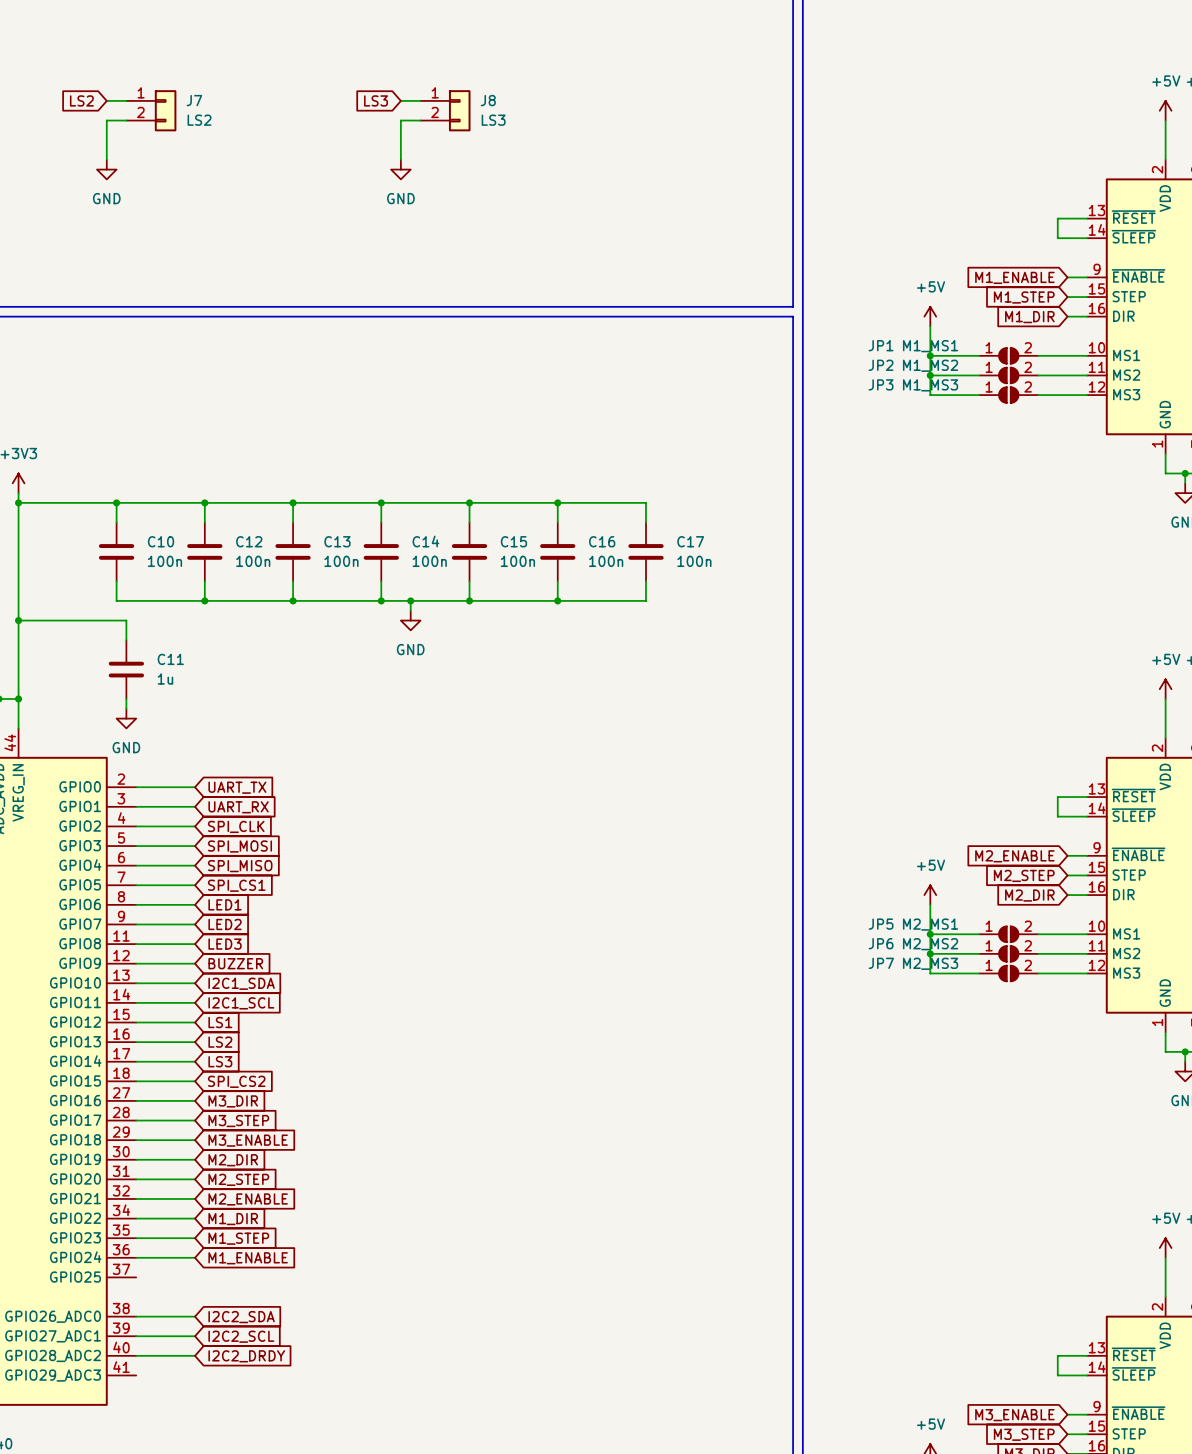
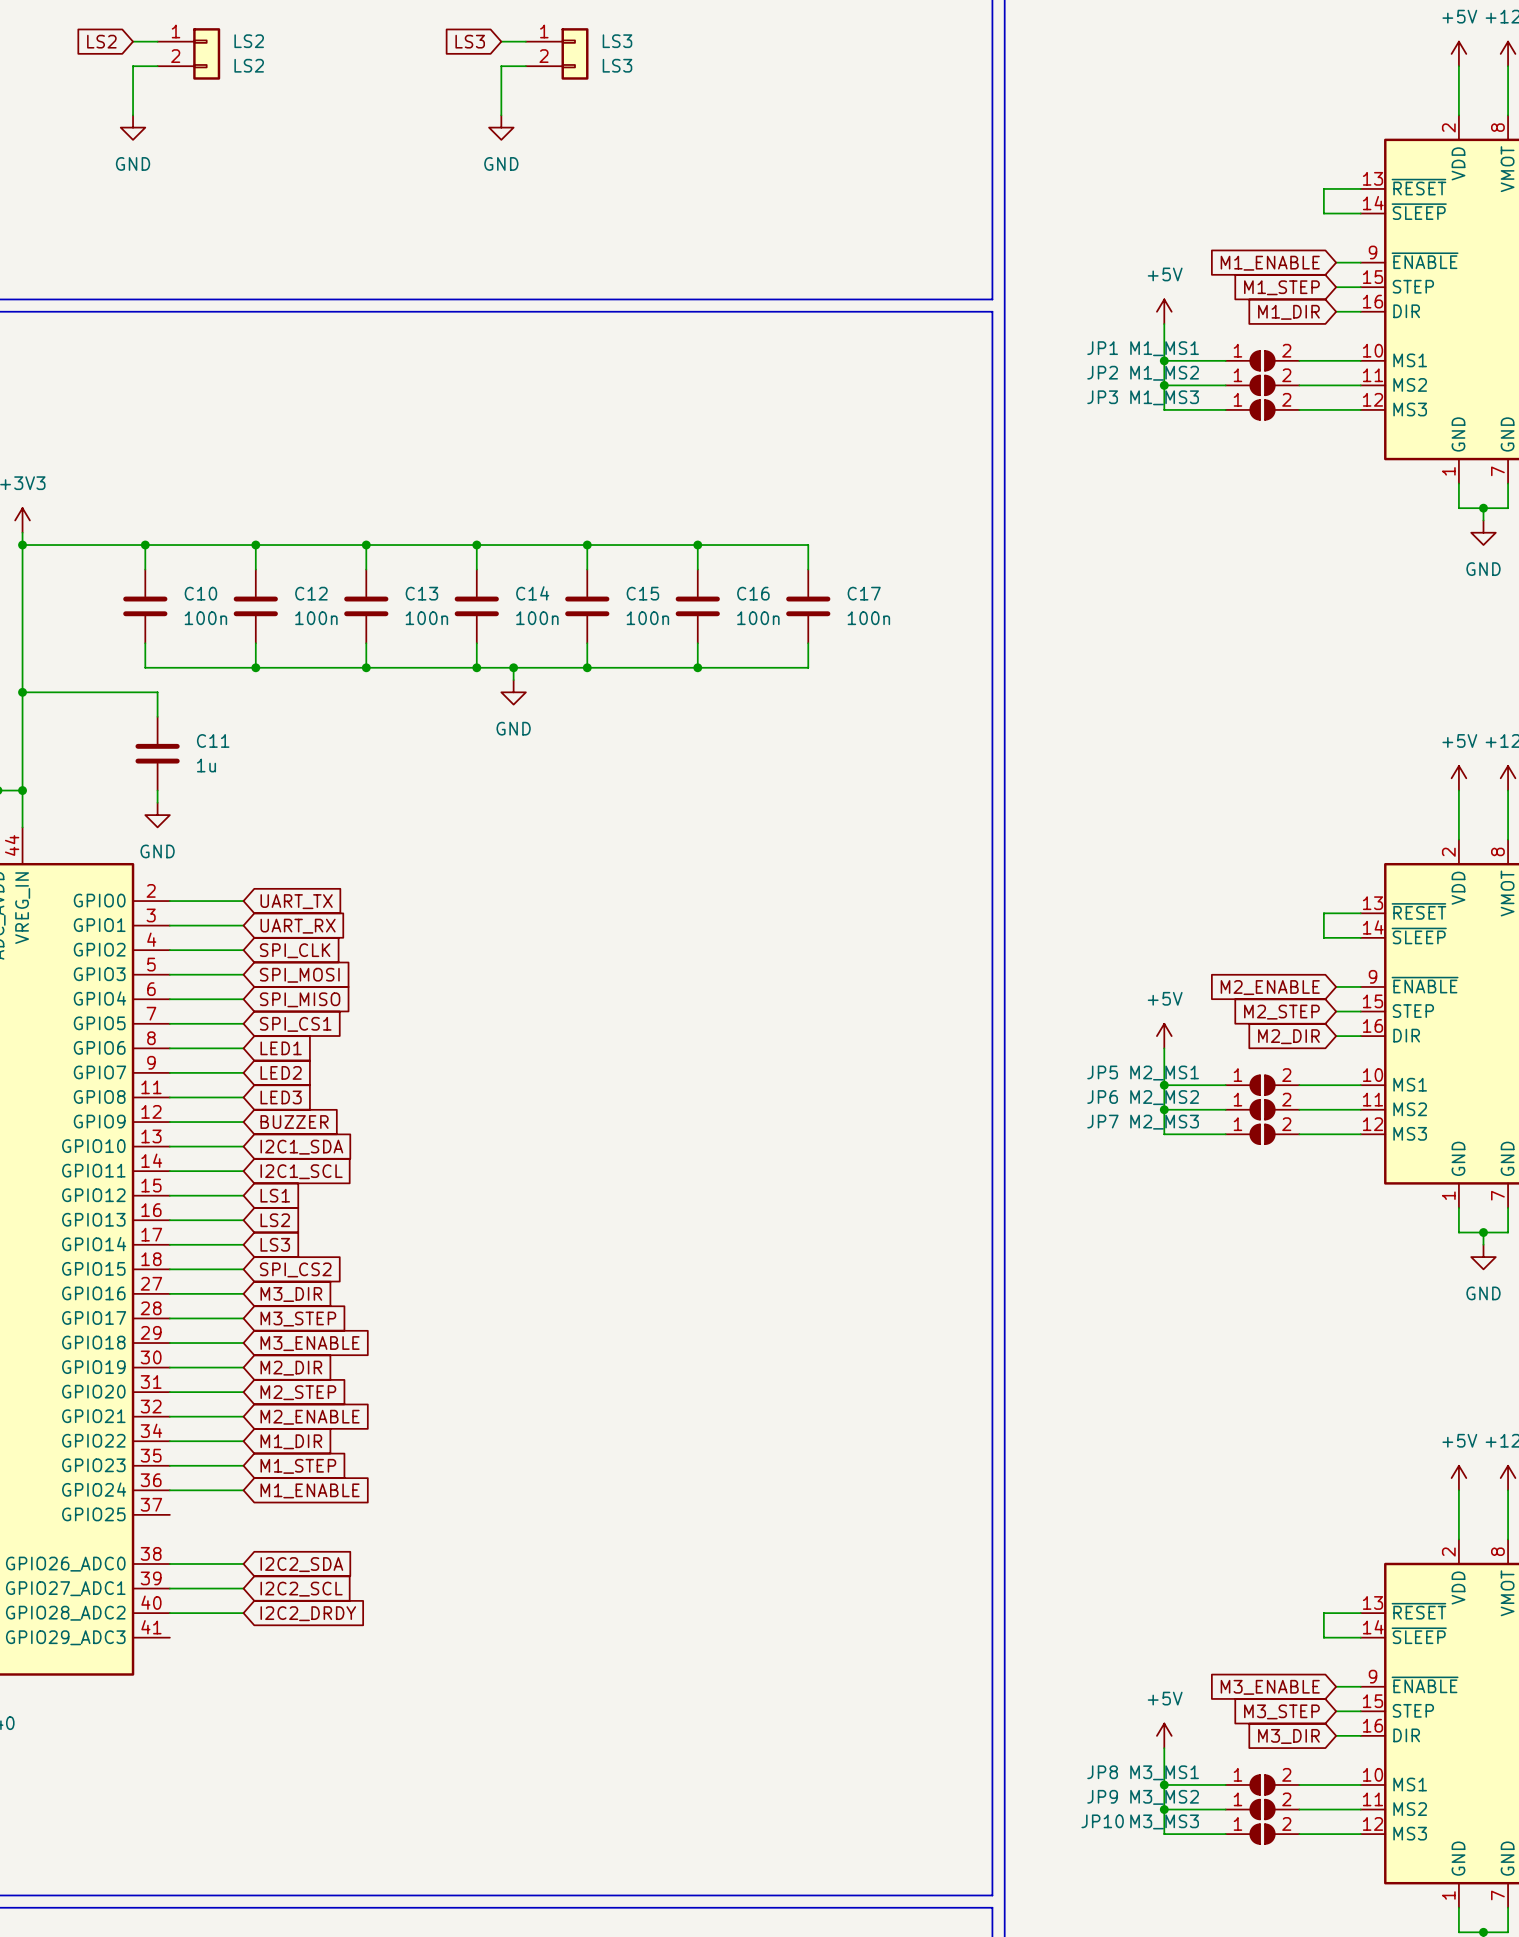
J7 name: J7 (194, 100) -> LS2 (249, 41)
J8 name: J8 (488, 100) -> LS3 (617, 41)

